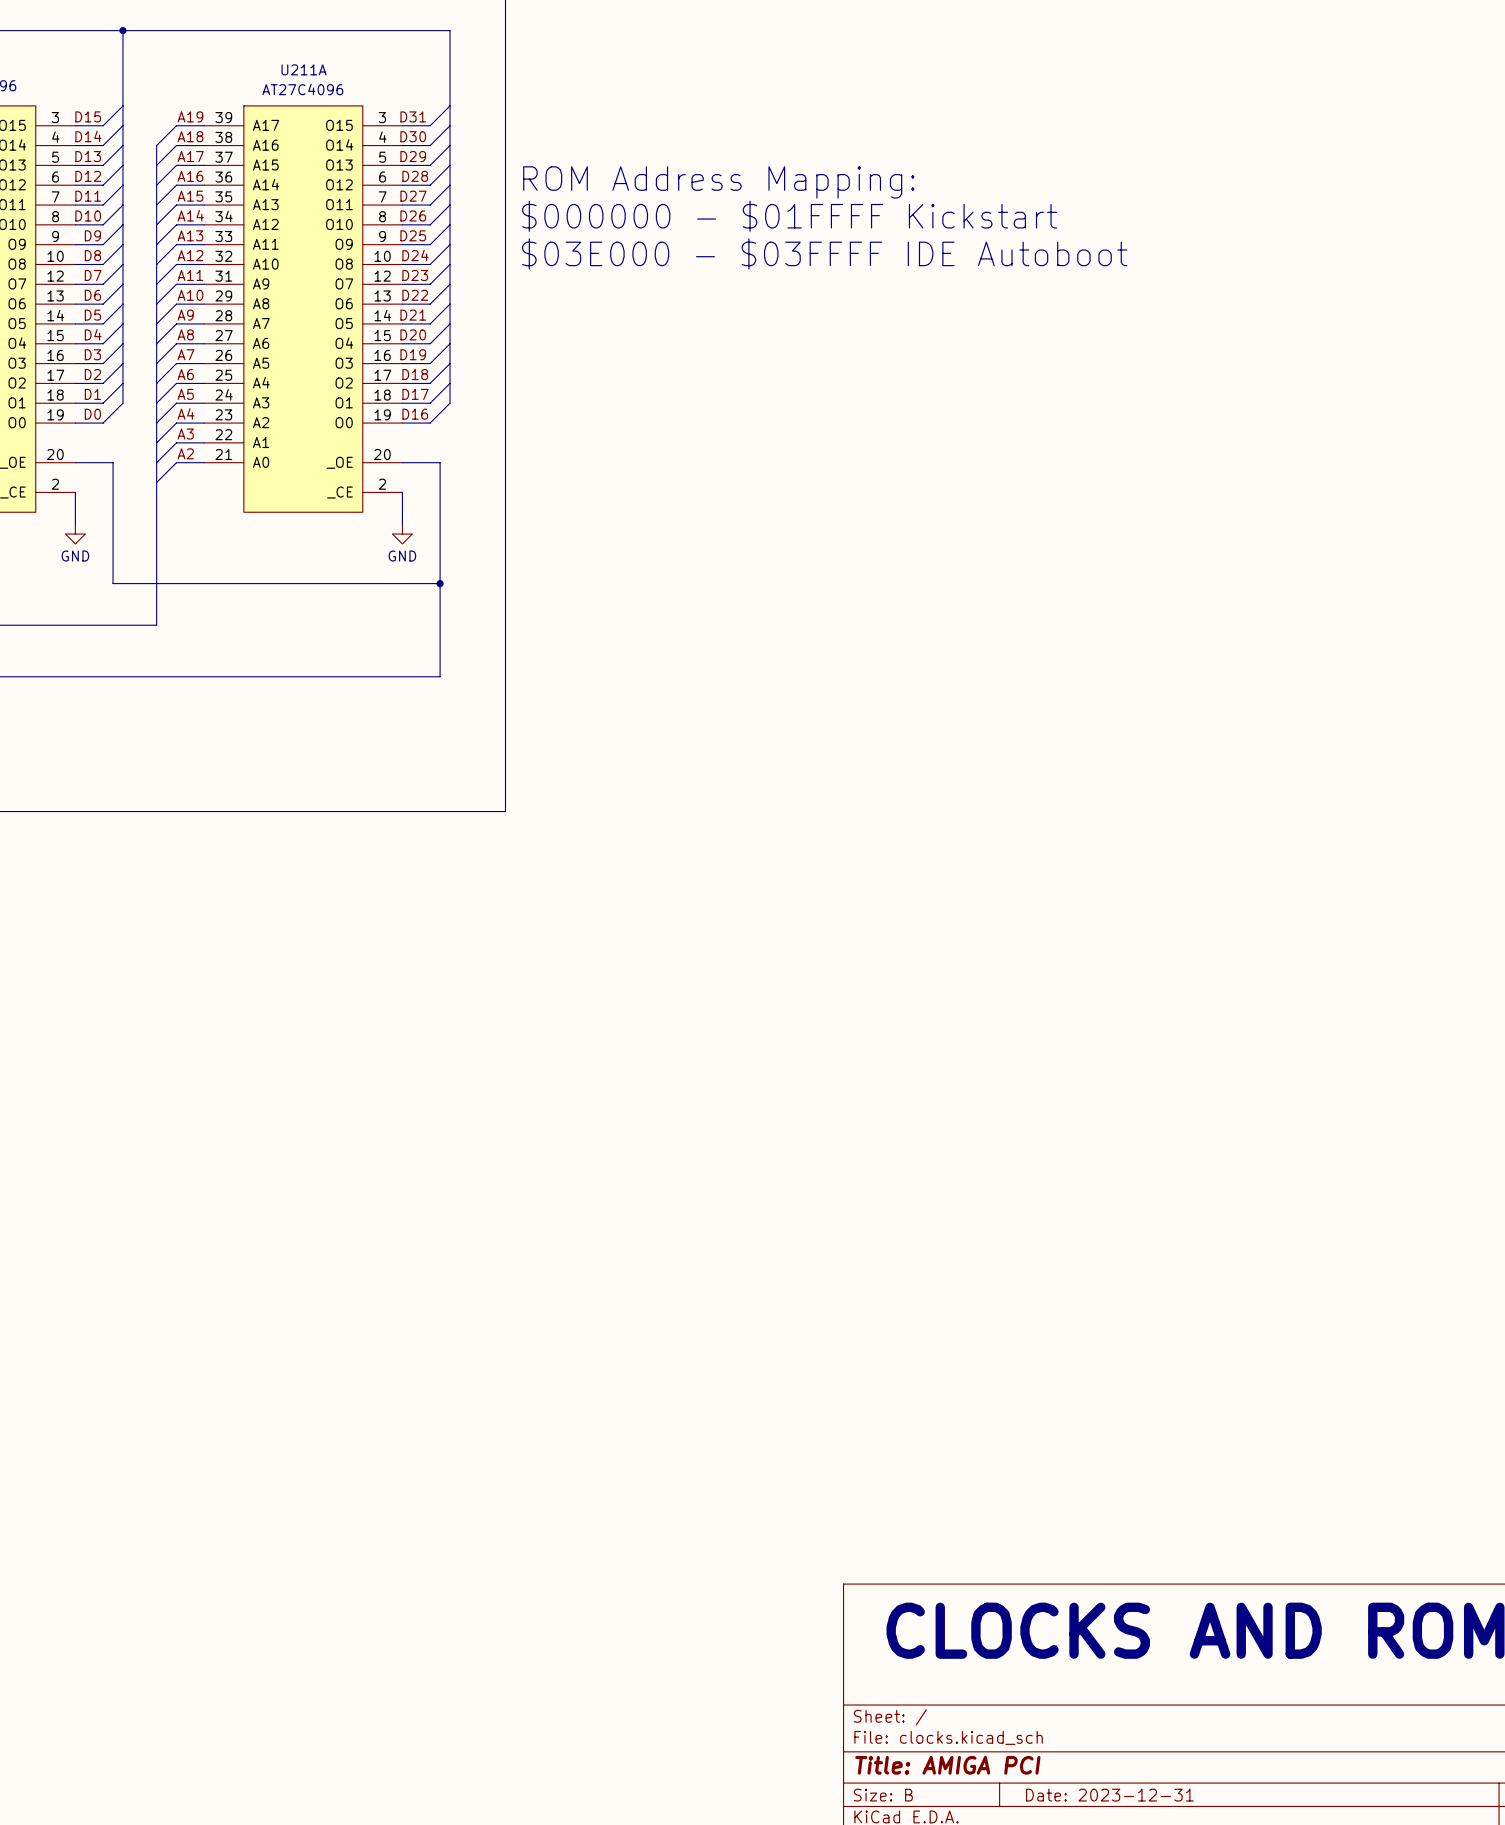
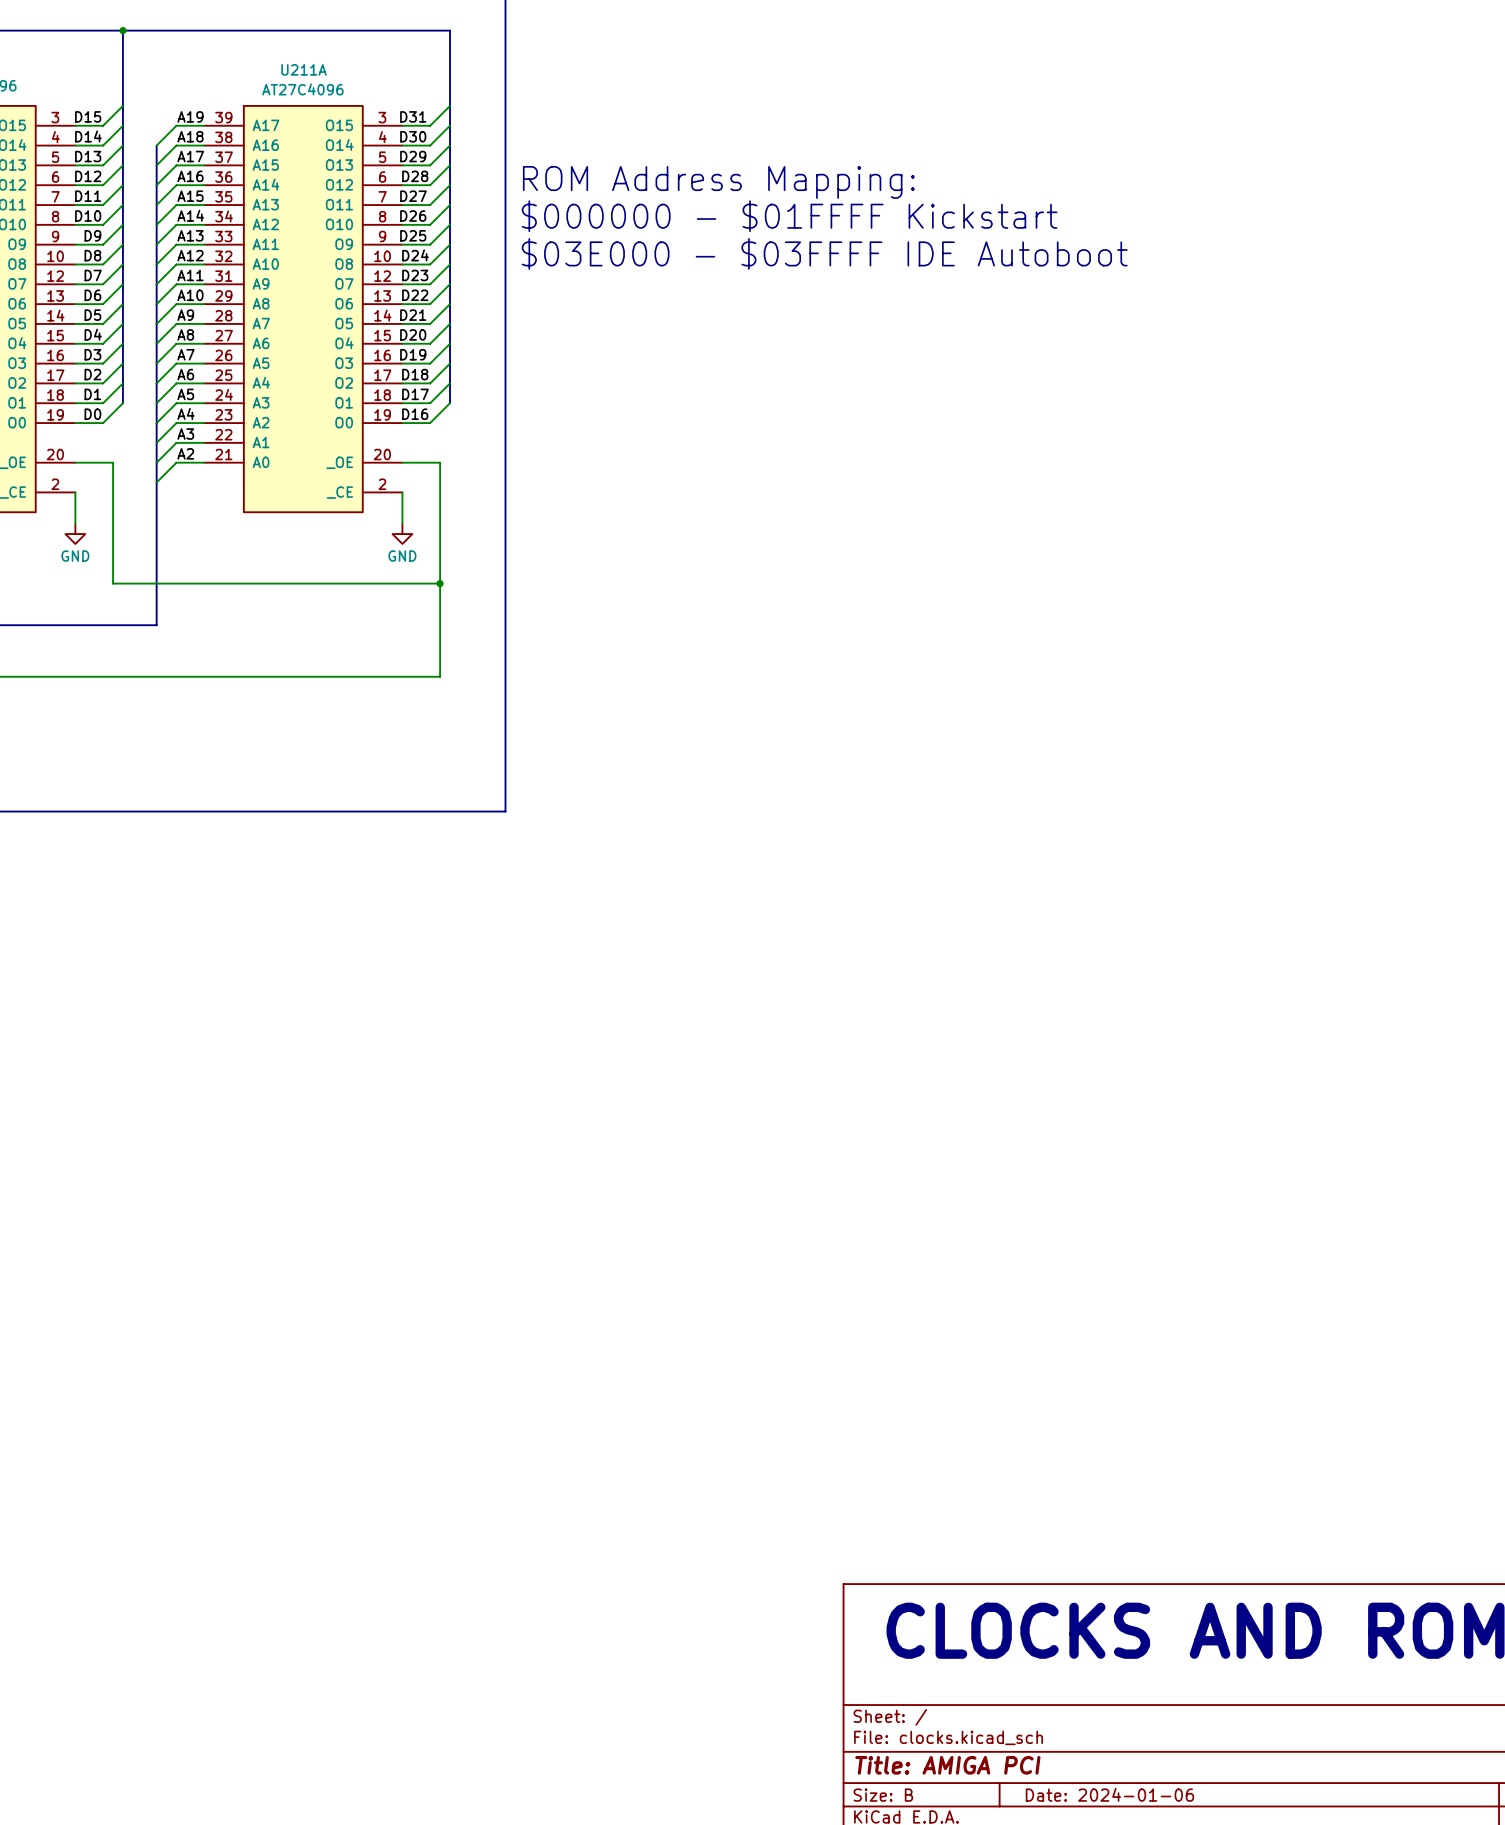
title block: Date: 2023-12-31 (1109, 1795) -> Date: 2024-01-06 (1109, 1794)

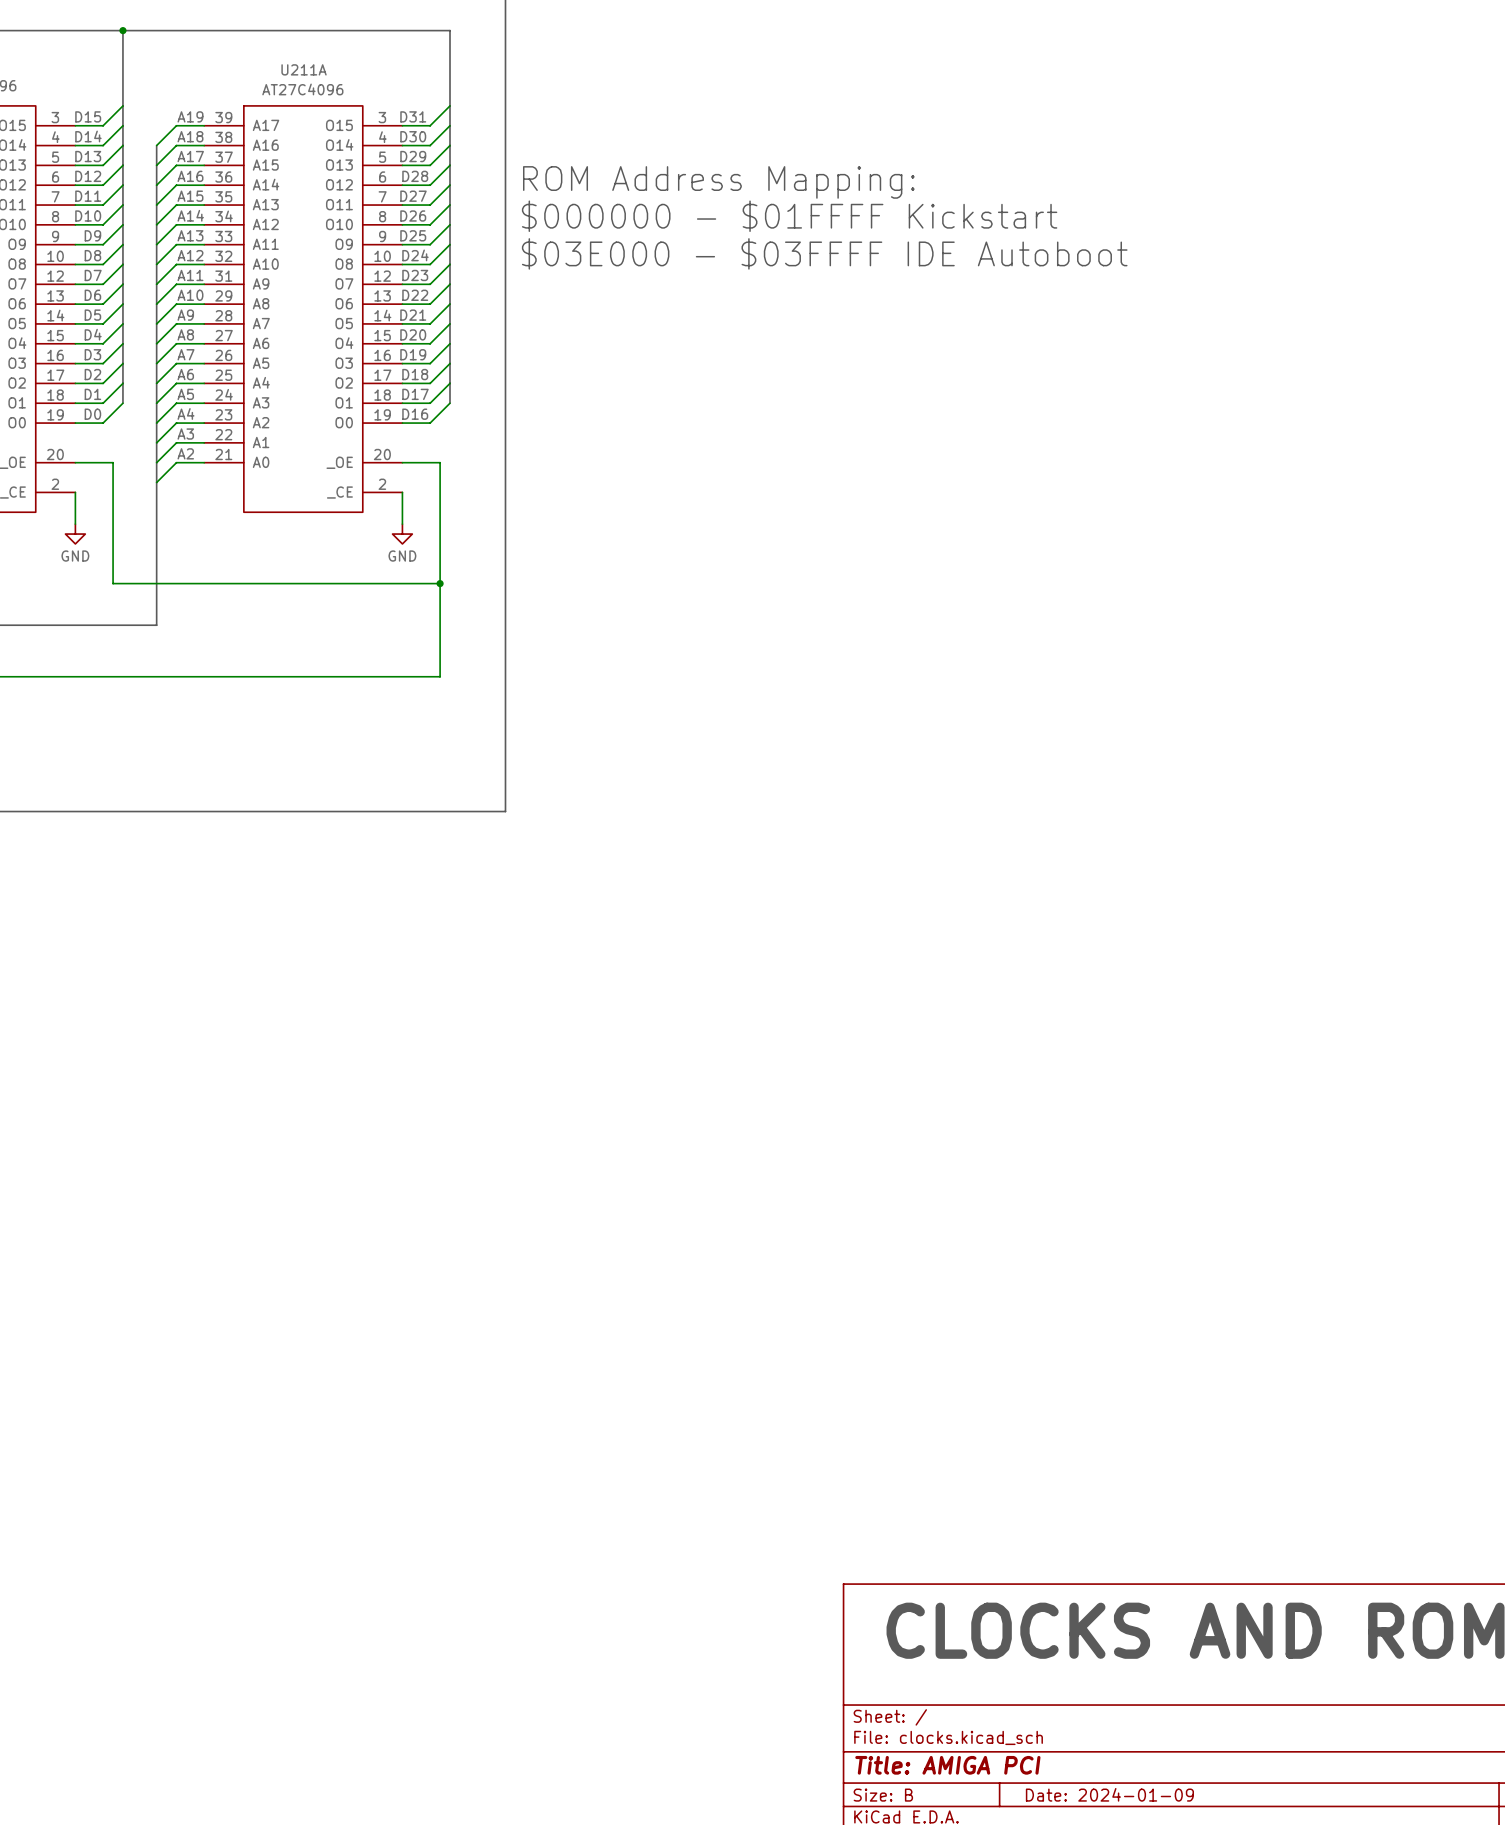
title block: Date: 2024-01-06 (1109, 1794) -> Date: 2024-01-09 (1109, 1794)

